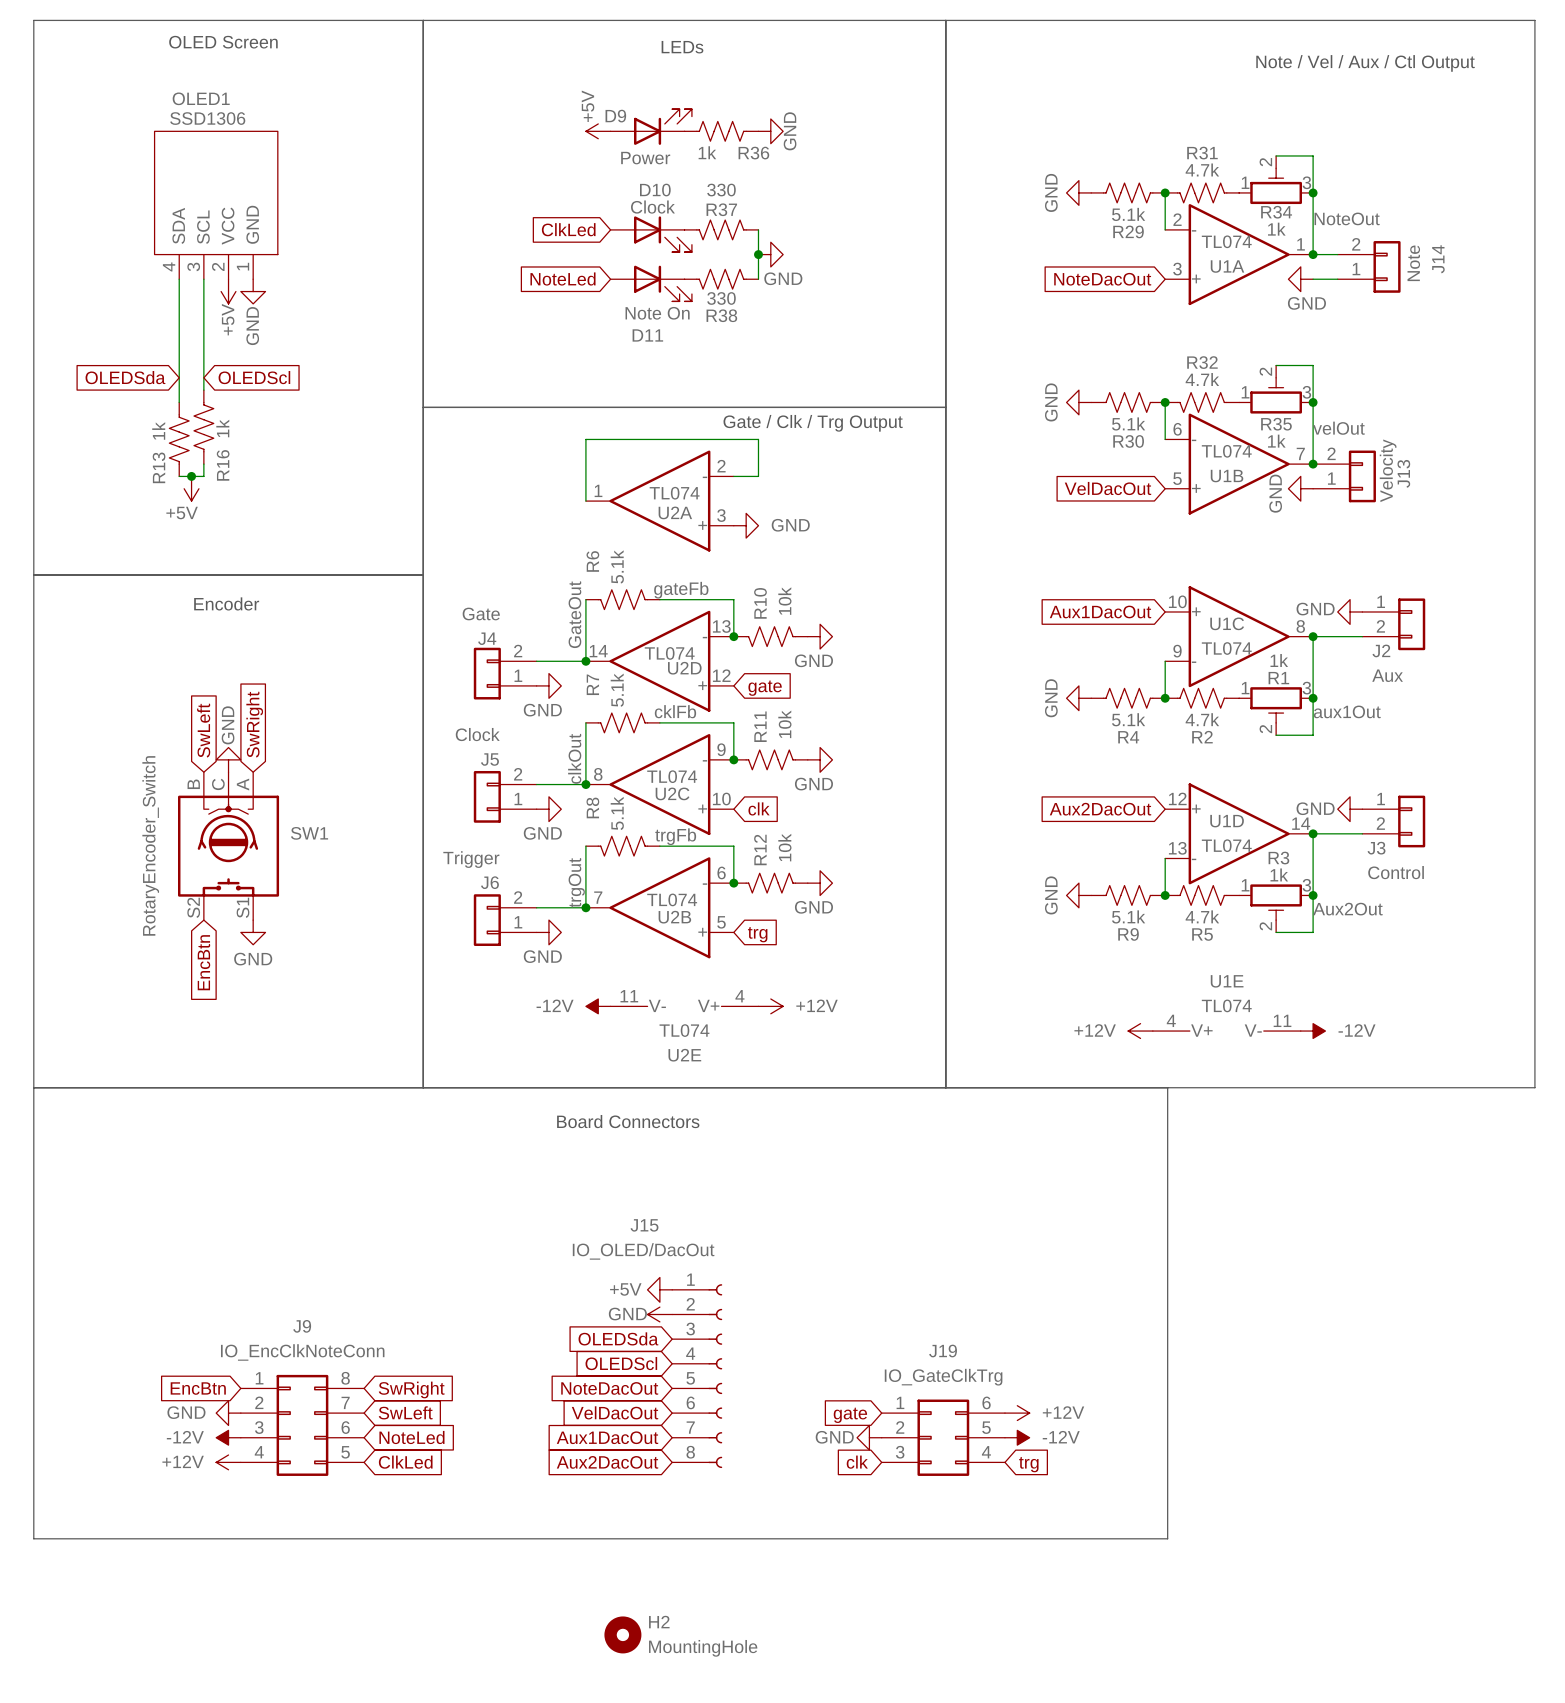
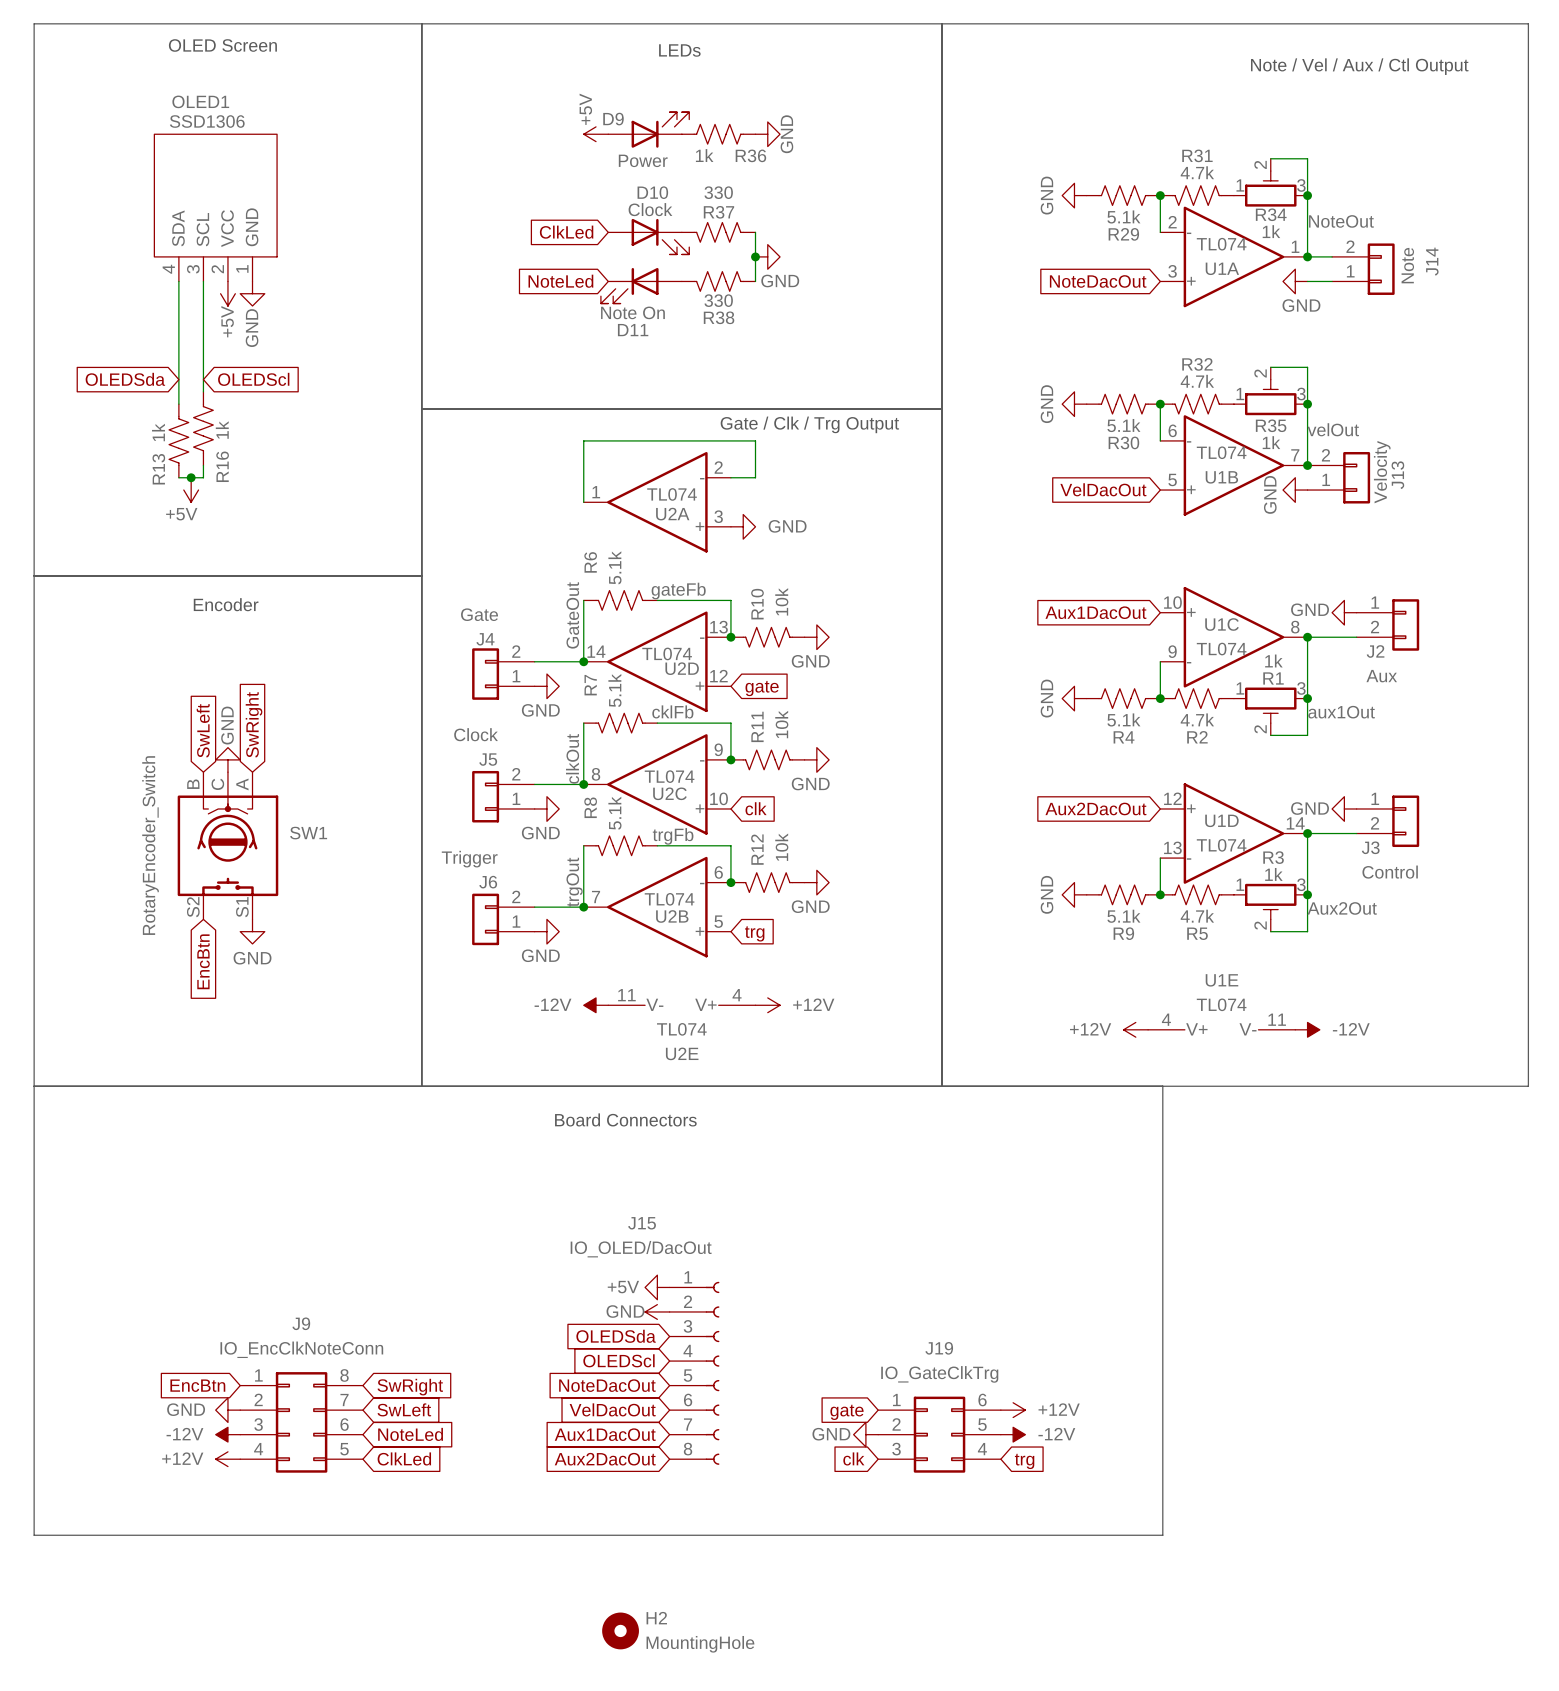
D11 flip: as is (662, 283) -> left-right (629, 285)

